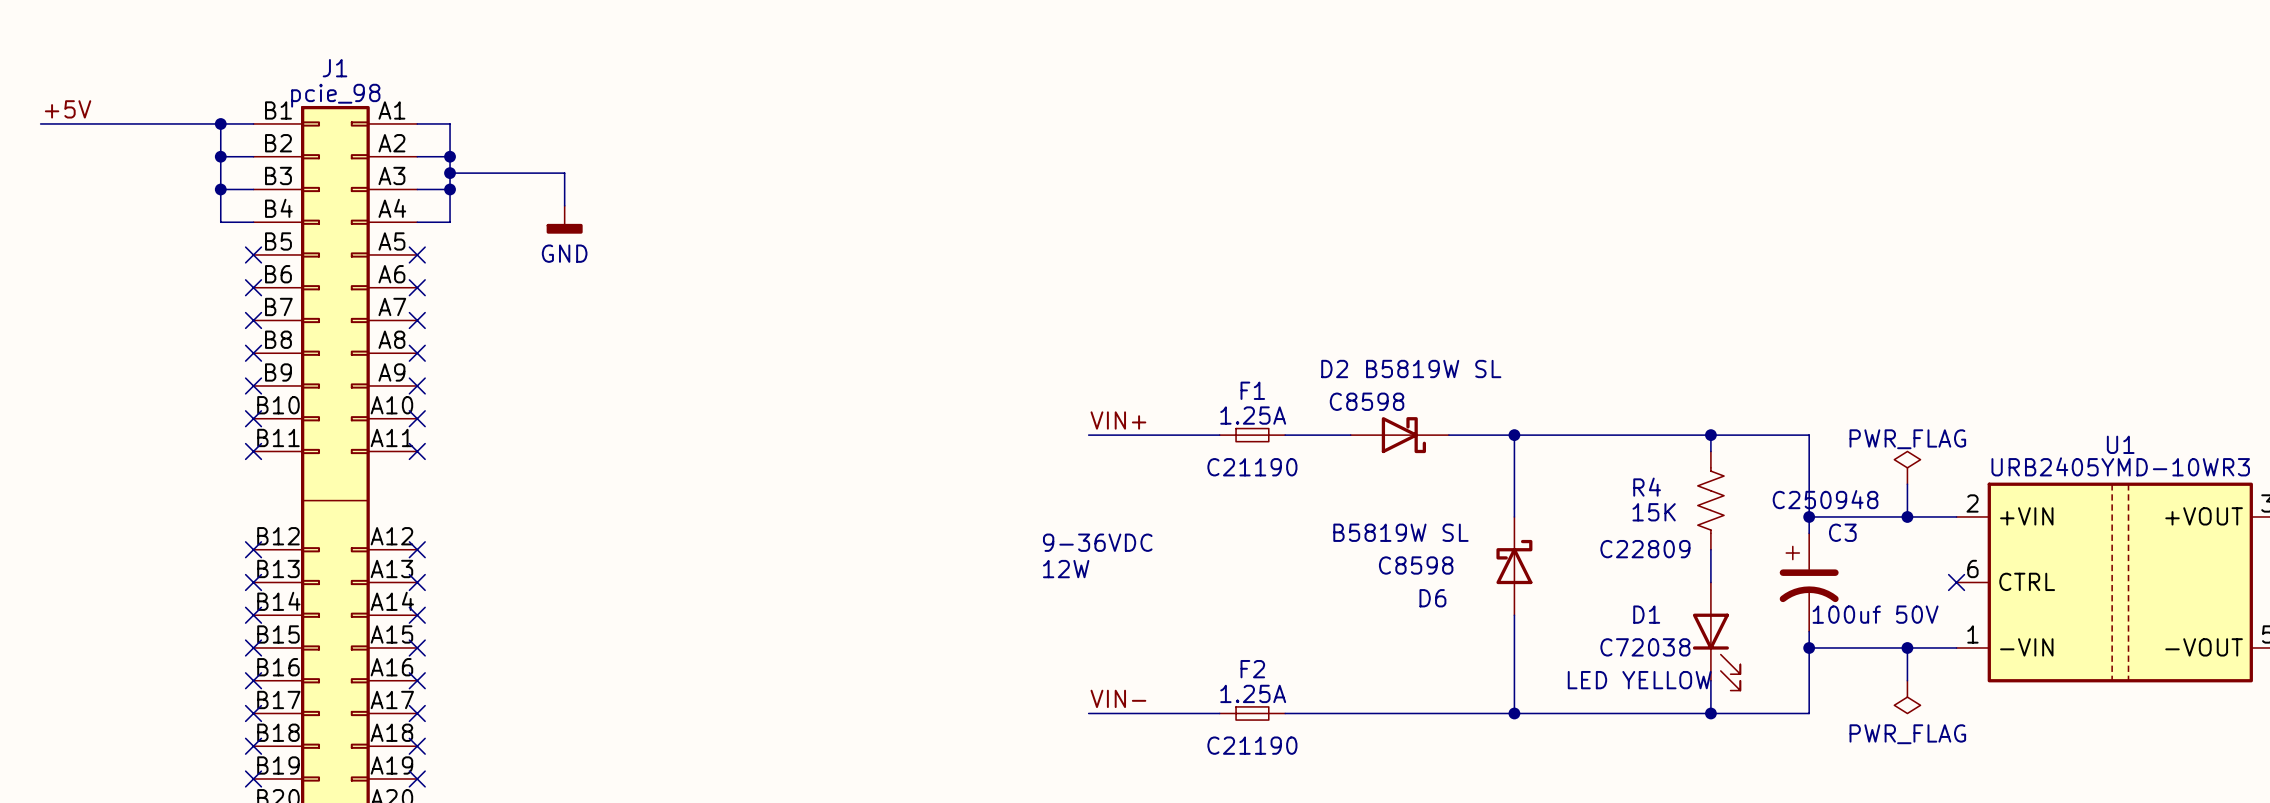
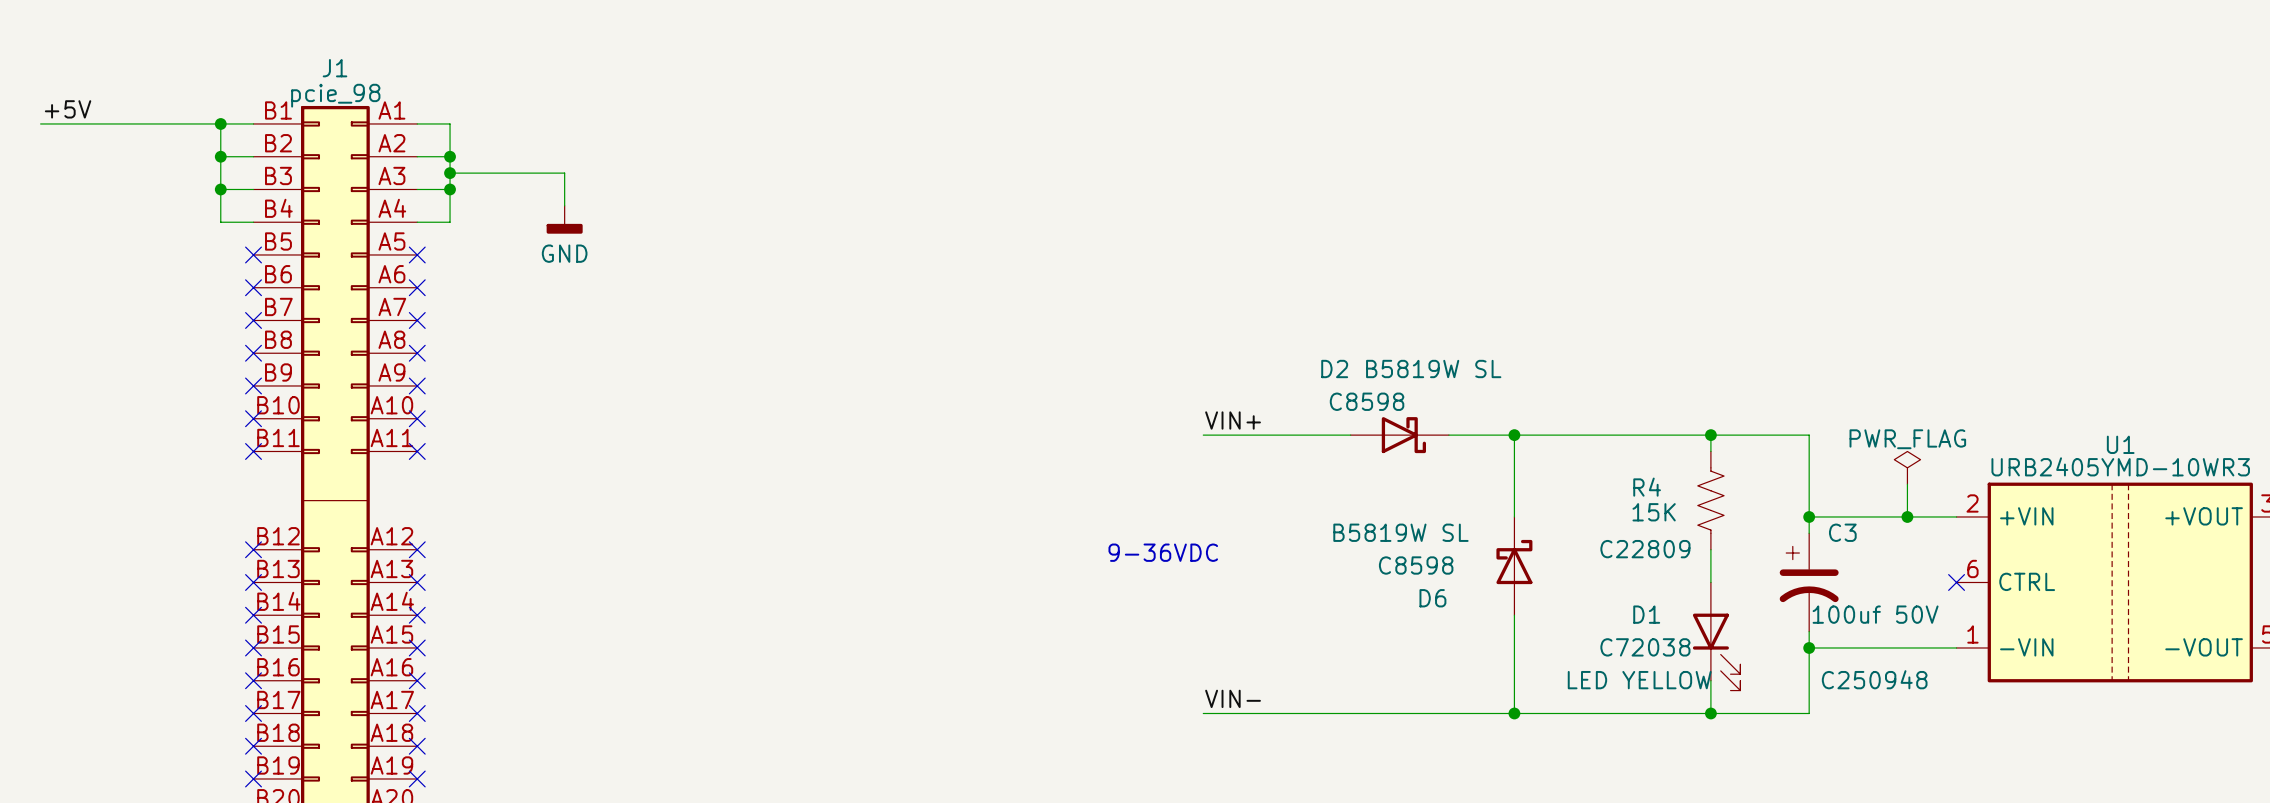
label position: VIN+ (1118, 420) -> VIN+ (1233, 420)
wire: (1088, 435) (1203, 435) -> none
F1: 1.25A (1252, 435) -> none
C3 text position: C250948 (1825, 499) -> C250948 (1874, 679)
text position: 9-36VDC (1097, 542) -> 9-36VDC (1163, 552)
text: 12W (1066, 569) -> none
wire: (1907, 647) (1907, 680) -> none
junction: (1907, 647) -> none
power symbol: PWR_FLAG (1907, 697) -> none
label position: VIN- (1118, 698) -> VIN- (1233, 698)
wire: (1088, 713) (1203, 713) -> none
F2: 1.25A (1252, 713) -> none

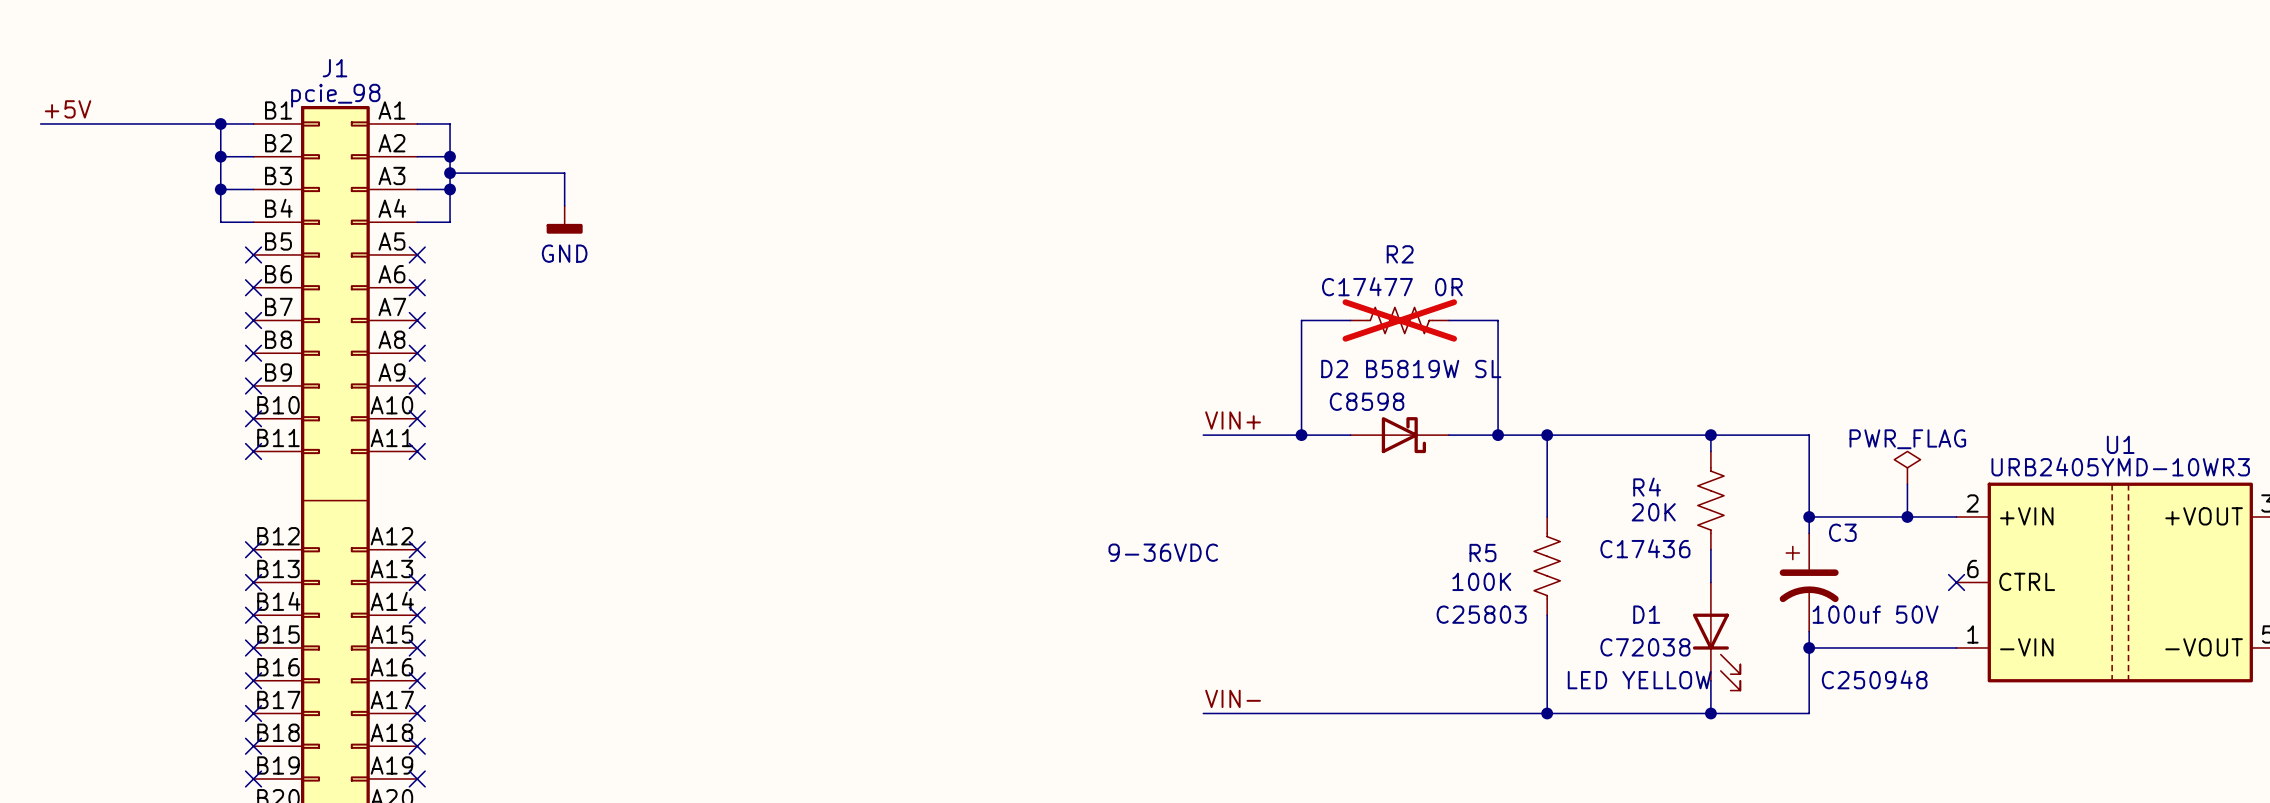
wire: none -> (1350, 320) (1301, 320) (1301, 435)
R2: none -> 0R (1399, 320)
wire: none -> (1448, 320) (1498, 320) (1498, 435)
junction: none -> (1301, 435)
junction: none -> (1498, 435)
wire: (1514, 435) (1514, 516) -> (1547, 435) (1547, 516)
junction: (1514, 435) -> none
junction: none -> (1547, 435)
R4 value: 15K (1654, 512) -> 20K (1653, 512)
R4 text: C22809 (1645, 549) -> C17436 (1645, 548)
D6: B5819W SL (1514, 566) -> none
R5: none -> 100K (1547, 566)
wire: (1514, 615) (1514, 713) -> (1547, 615) (1547, 713)
junction position: (1514, 713) -> (1547, 713)

